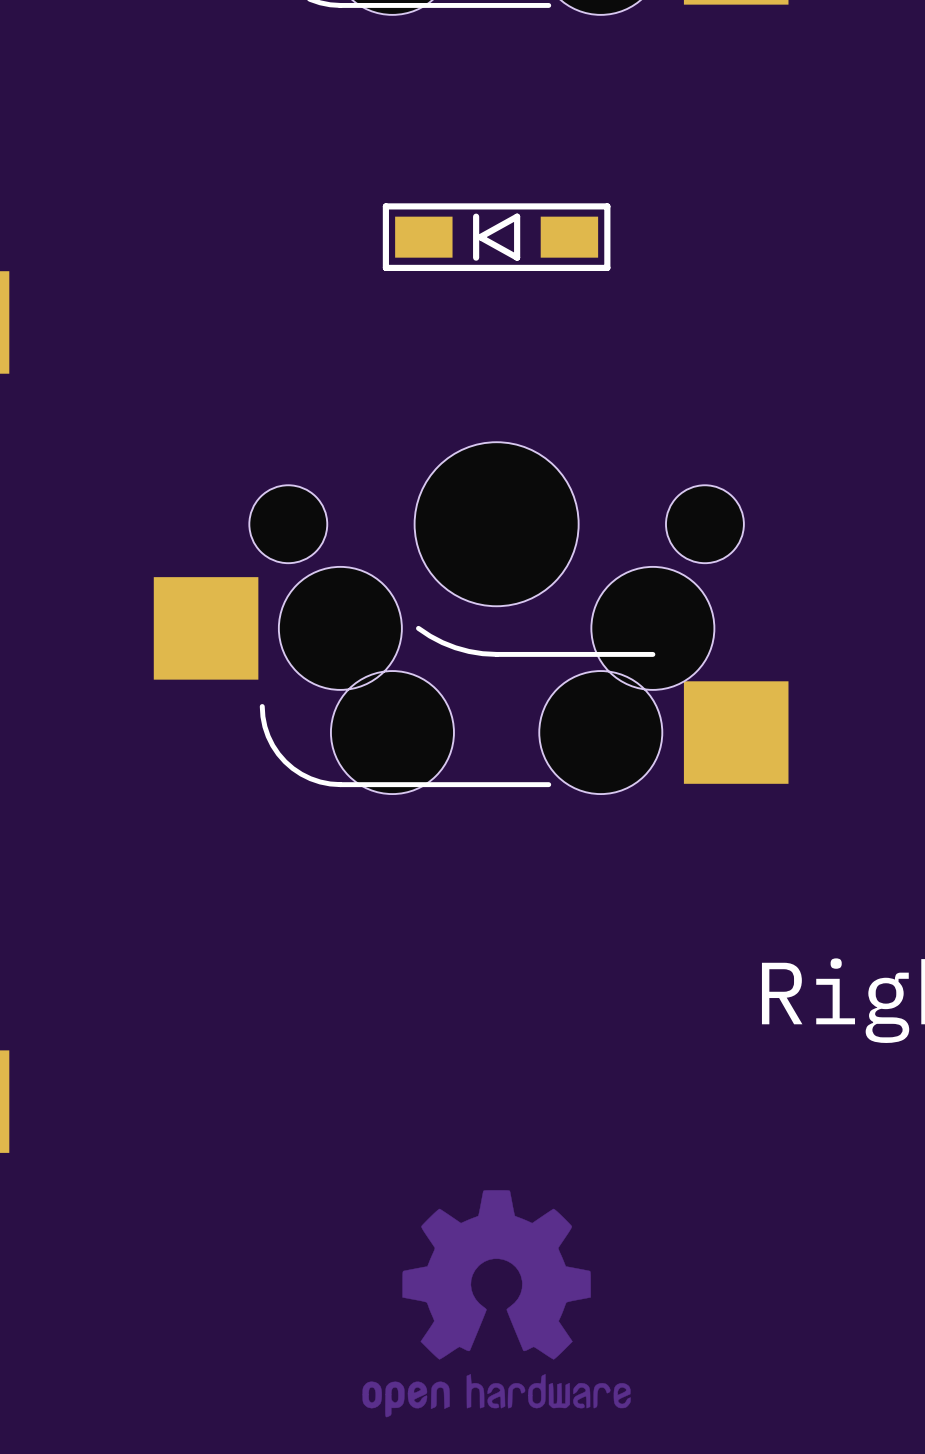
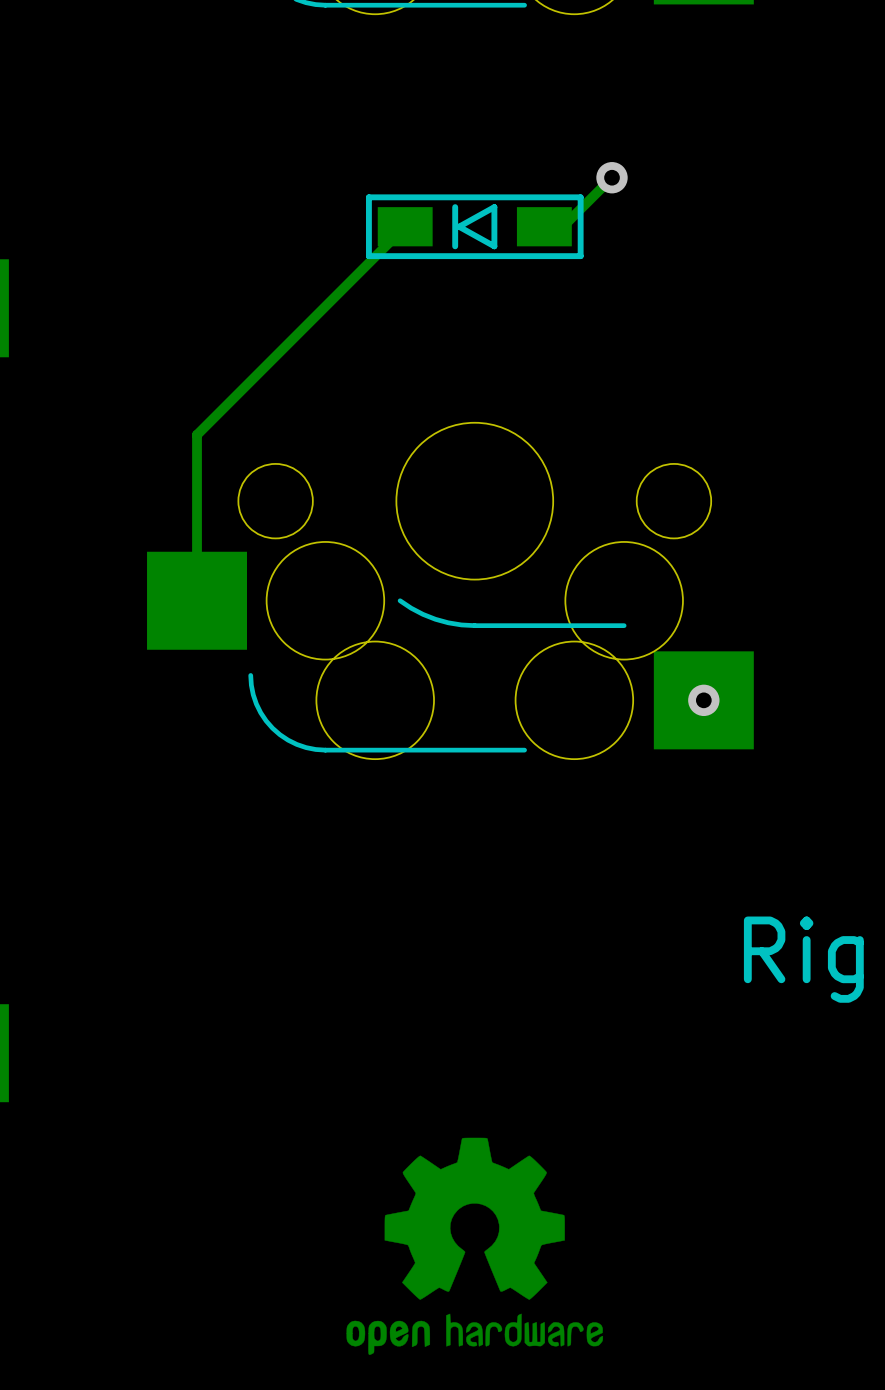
track: none -> (612, 177) (563, 226)
via: none -> (612, 177)
track: none -> (405, 226) (197, 434) (197, 600)
via: none -> (703, 700)

